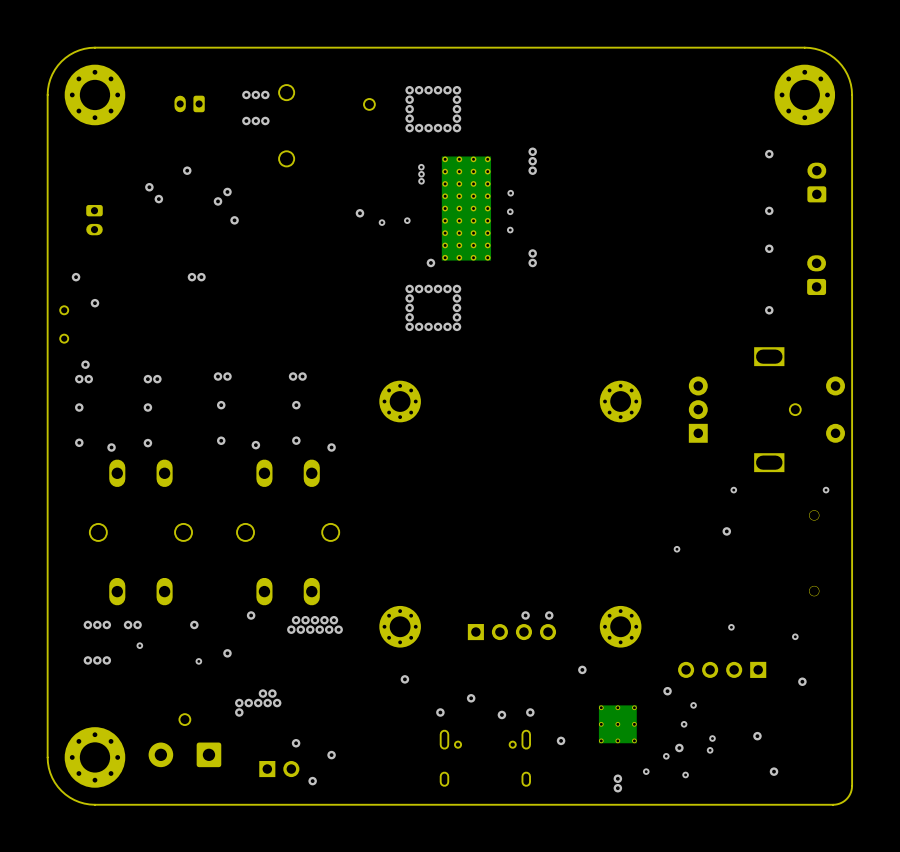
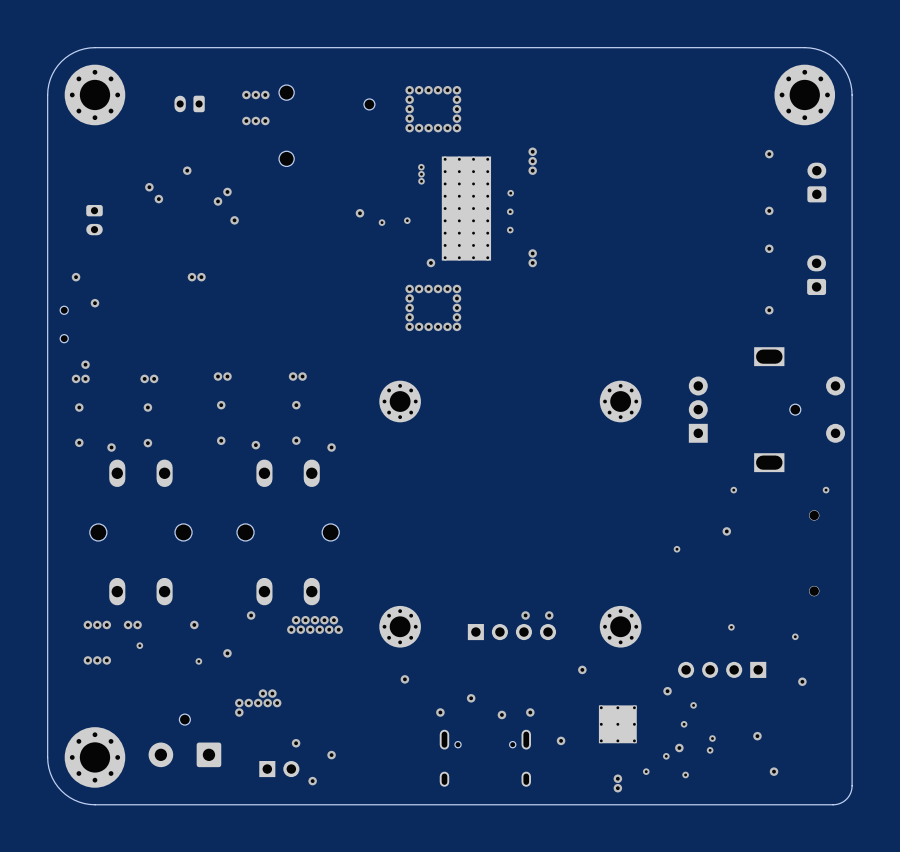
via: none -> (76, 378)
via: none -> (85, 378)
via: none -> (144, 378)
via: none -> (154, 378)
via: (79, 379) -> none
via: (88, 379) -> none
via: (147, 379) -> none
via: (157, 379) -> none

